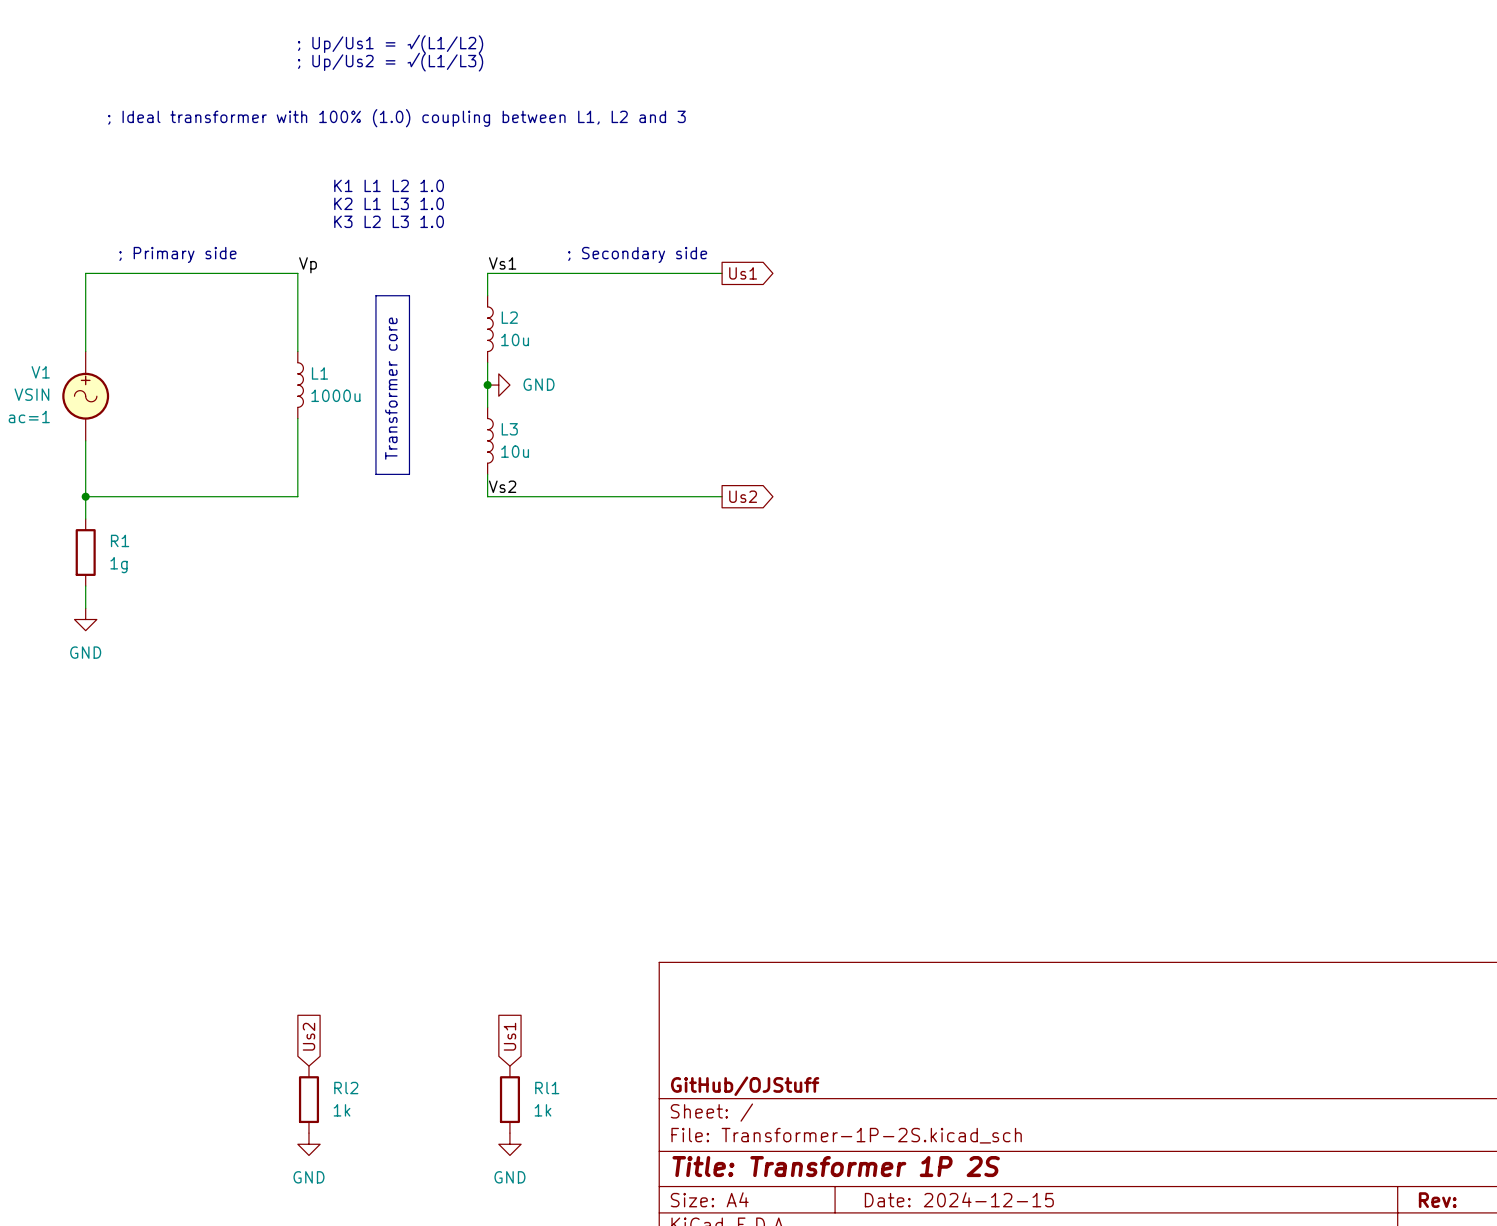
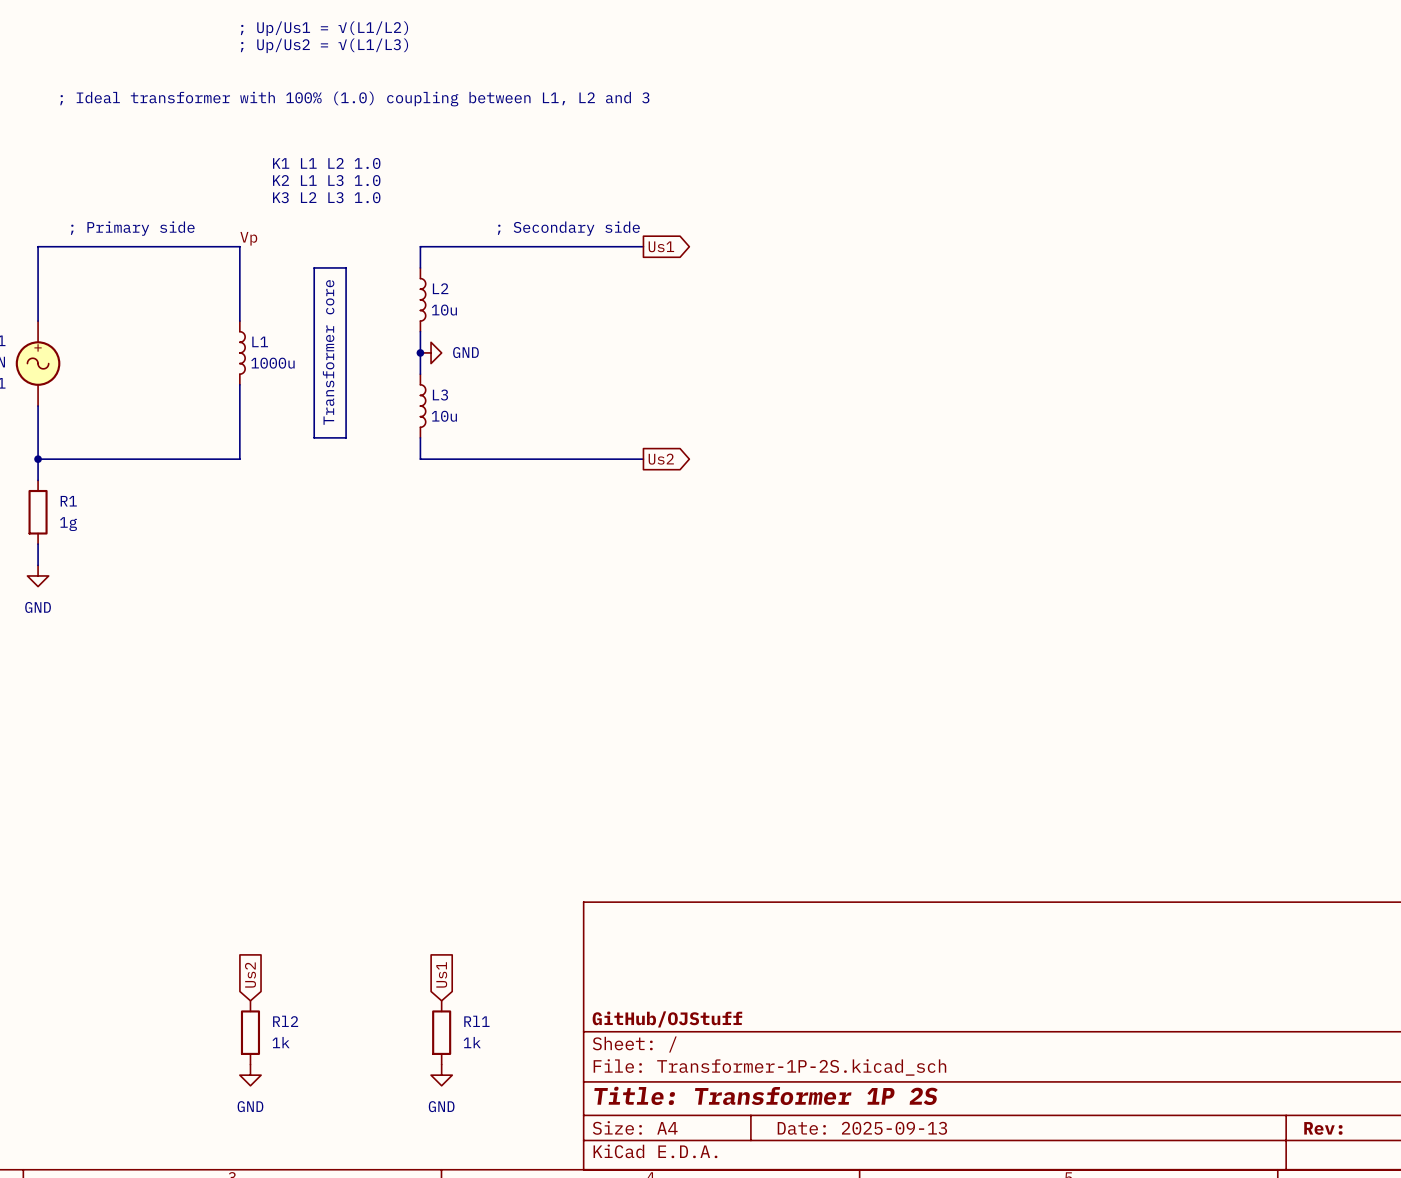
label: Vs1 (502, 263) -> none
label: Vs2 (502, 486) -> none
title block: Date: 2024-12-15 (959, 1199) -> Date: 2025-09-13 (862, 1128)

